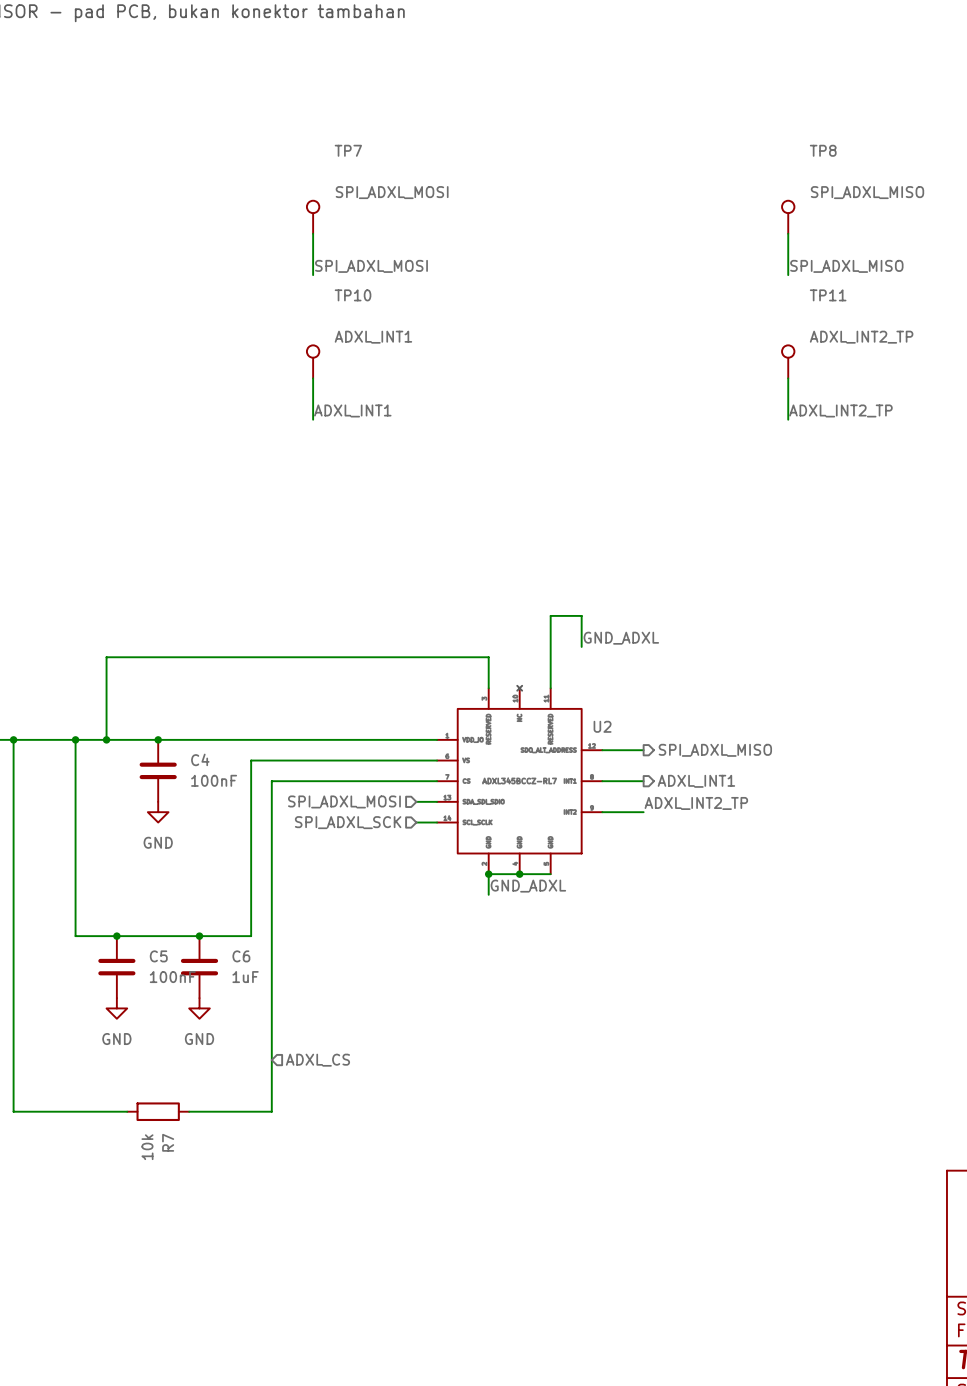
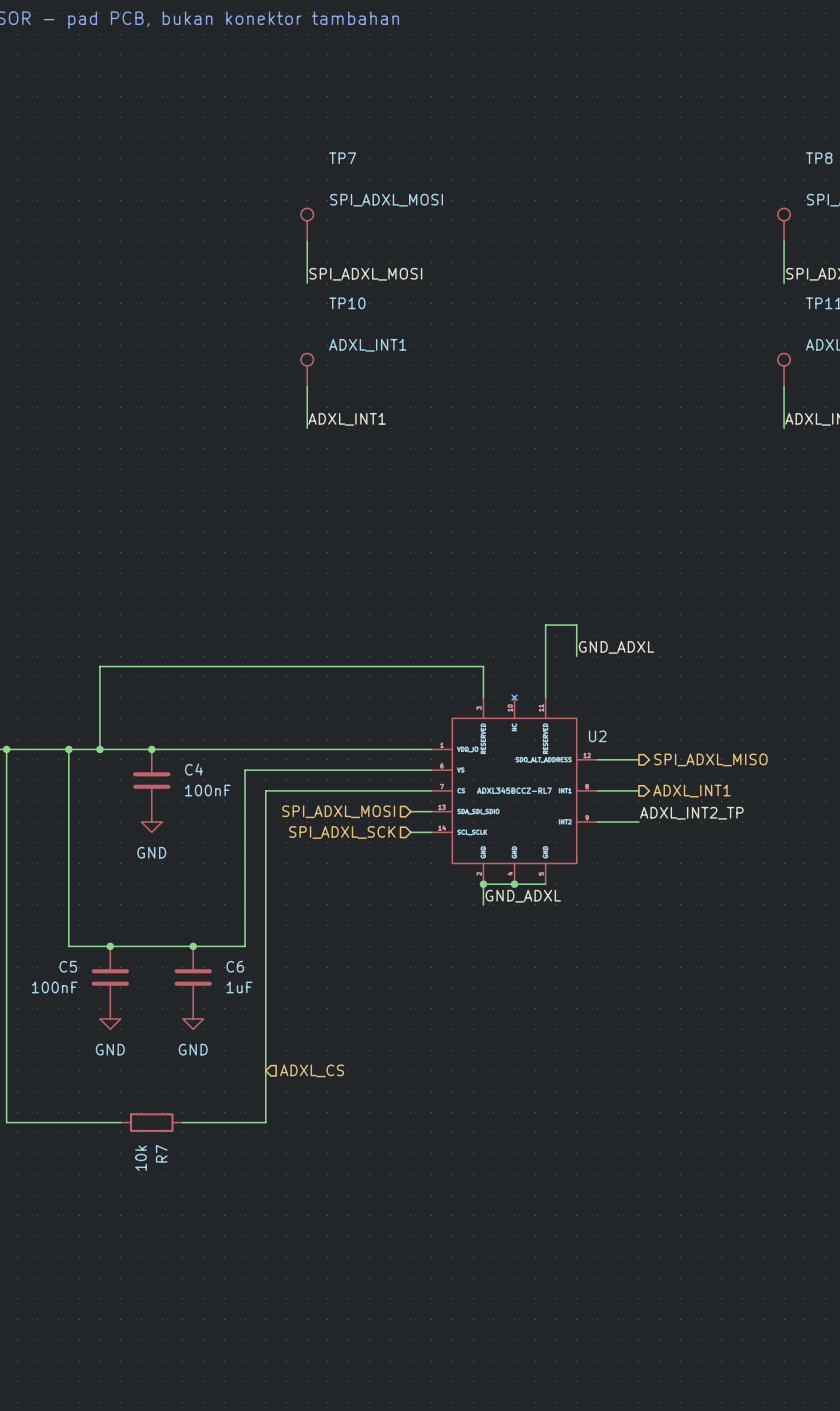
C5 name position: C5 (158, 956) -> C5 (68, 966)
C5 value position: 100nF (172, 977) -> 100nF (54, 987)

